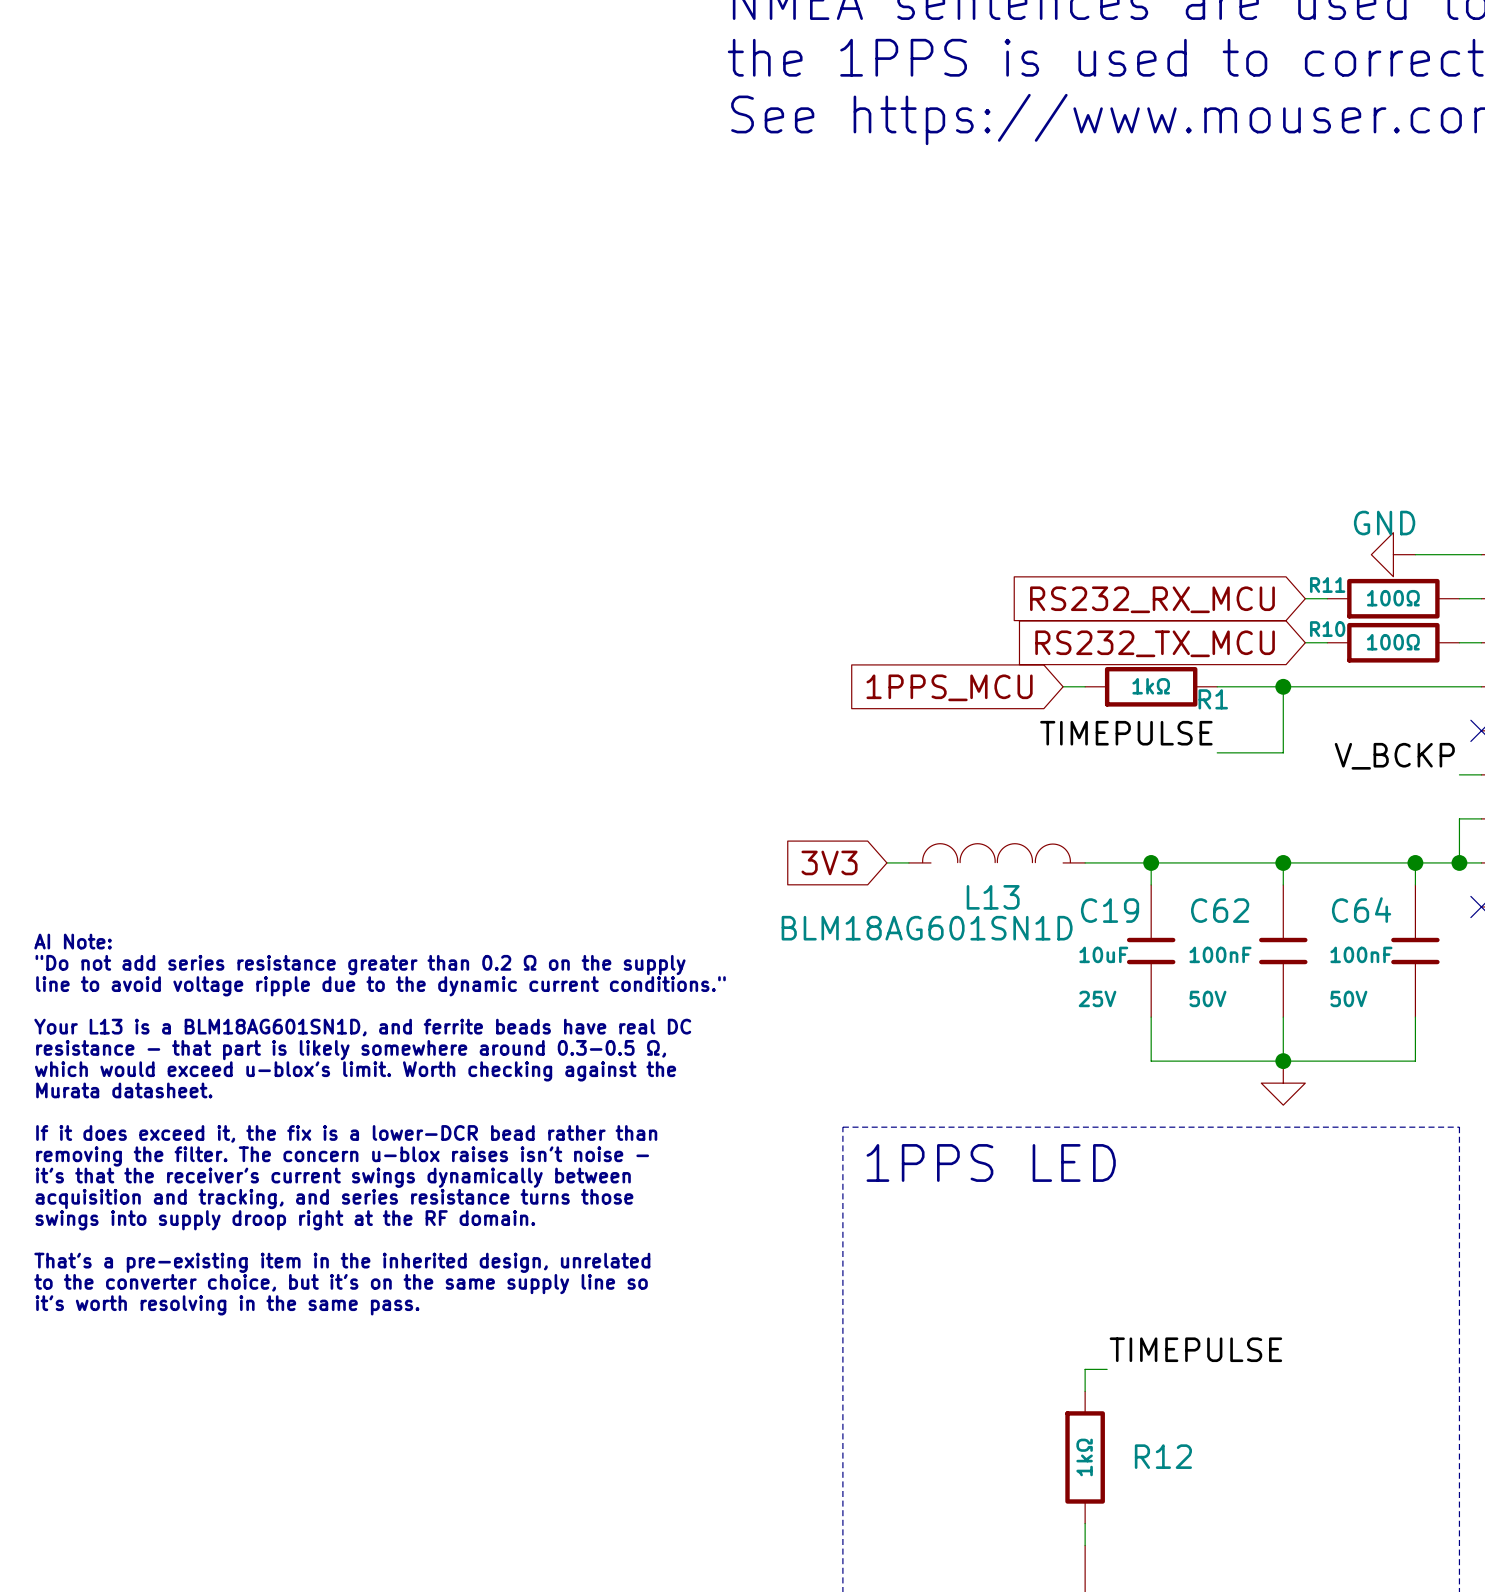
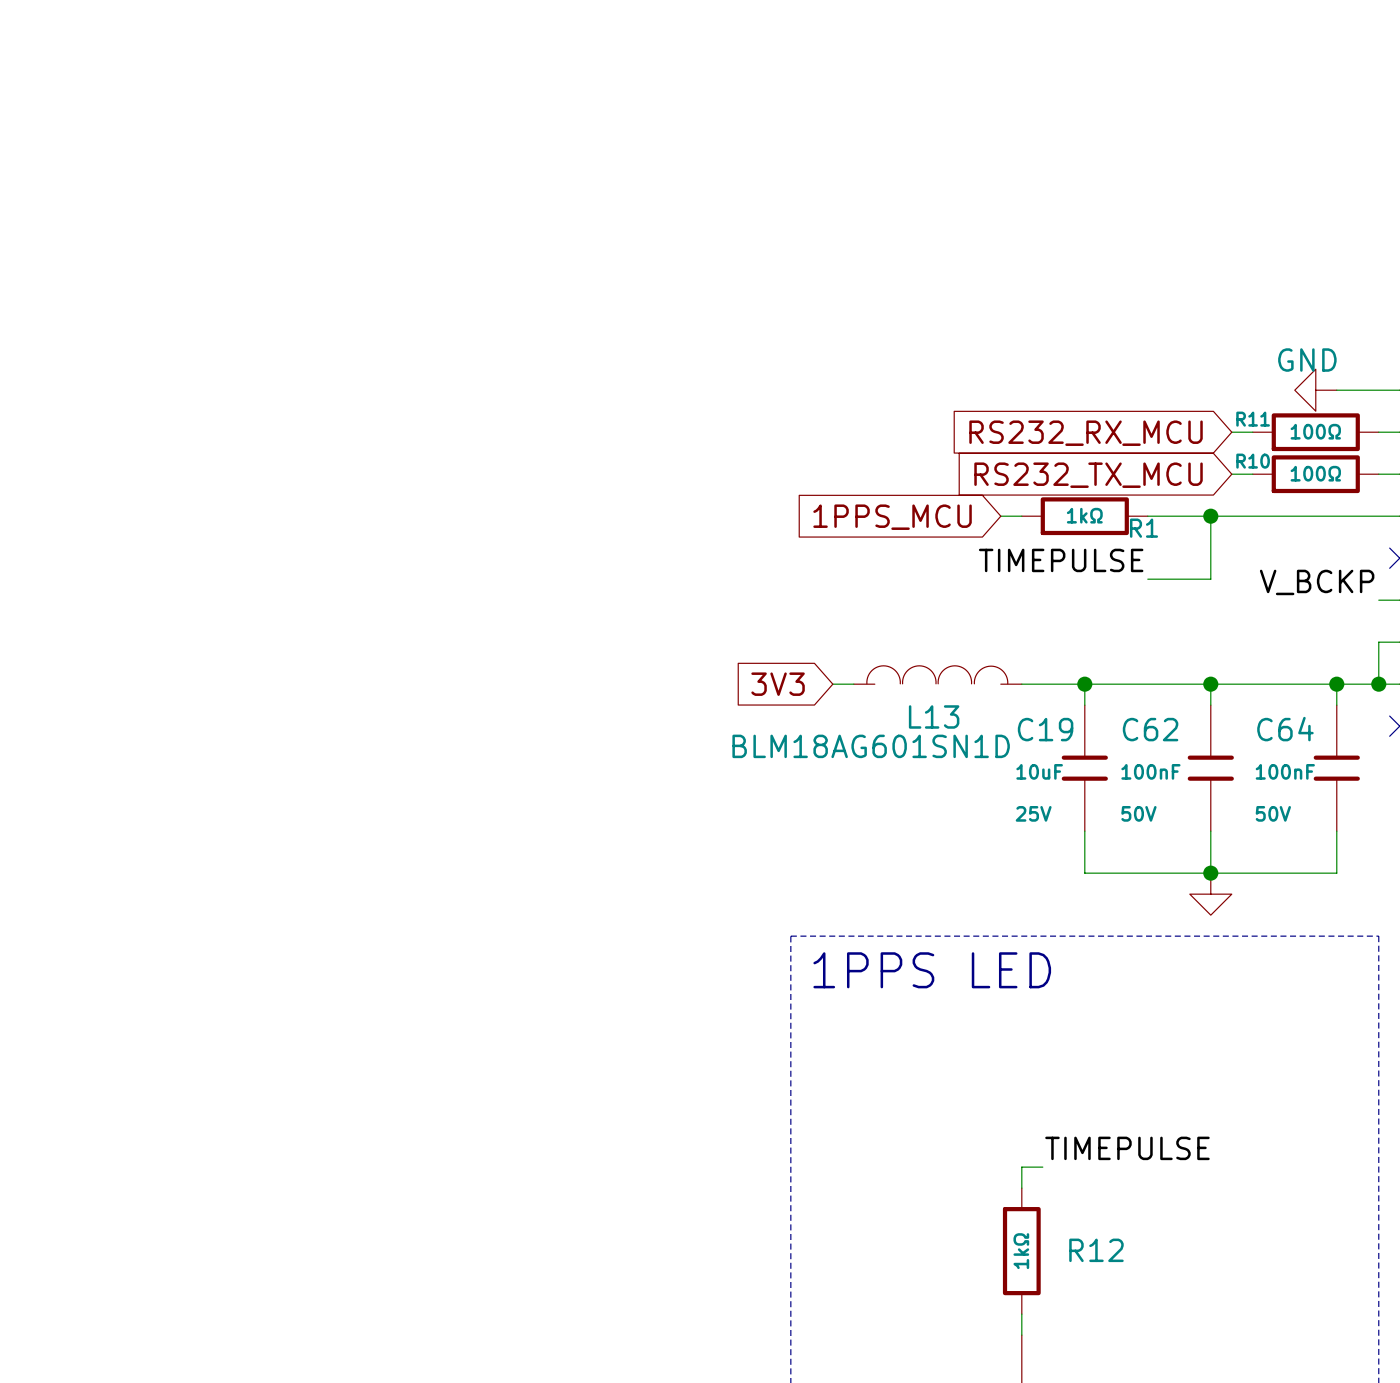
text: AI Note: (73, 941) -> none
text: "Do not add series resistance greater than 0.2 Ω on the supply (360, 965) -> none
text: line to avoid voltage ripple due to the dynamic current conditions." (381, 986) -> none
text: Your L13 is a BLM18AG601SN1D, and ferrite beads have real DC (362, 1027) -> none
text: resistance - that part is likely somewhere around 0.3-0.5 Ω, (351, 1050) -> none
text: which would exceed u-blox's limit. Worth checking against the (355, 1071) -> none
text: Murata datasheet. (124, 1090) -> none
text: If it does exceed it, the fix is a lower-DCR bead rather than (346, 1133) -> none
text: removing the filter. The concern u-blox raises isn't noise - (342, 1156) -> none
text: it's that the receiver's current swings dynamically between (333, 1177) -> none
text: acquisition and tracking, and series resistance turns those (334, 1198) -> none
text: swings into supply droop right at the RF domain. (285, 1220) -> none
text: That's a pre-existing item in the inherited design, unrelated (342, 1262) -> none
text: to the converter choice, but it's on the same supply line so (341, 1284) -> none
text: it's worth resolving in the same pass. (227, 1305) -> none

